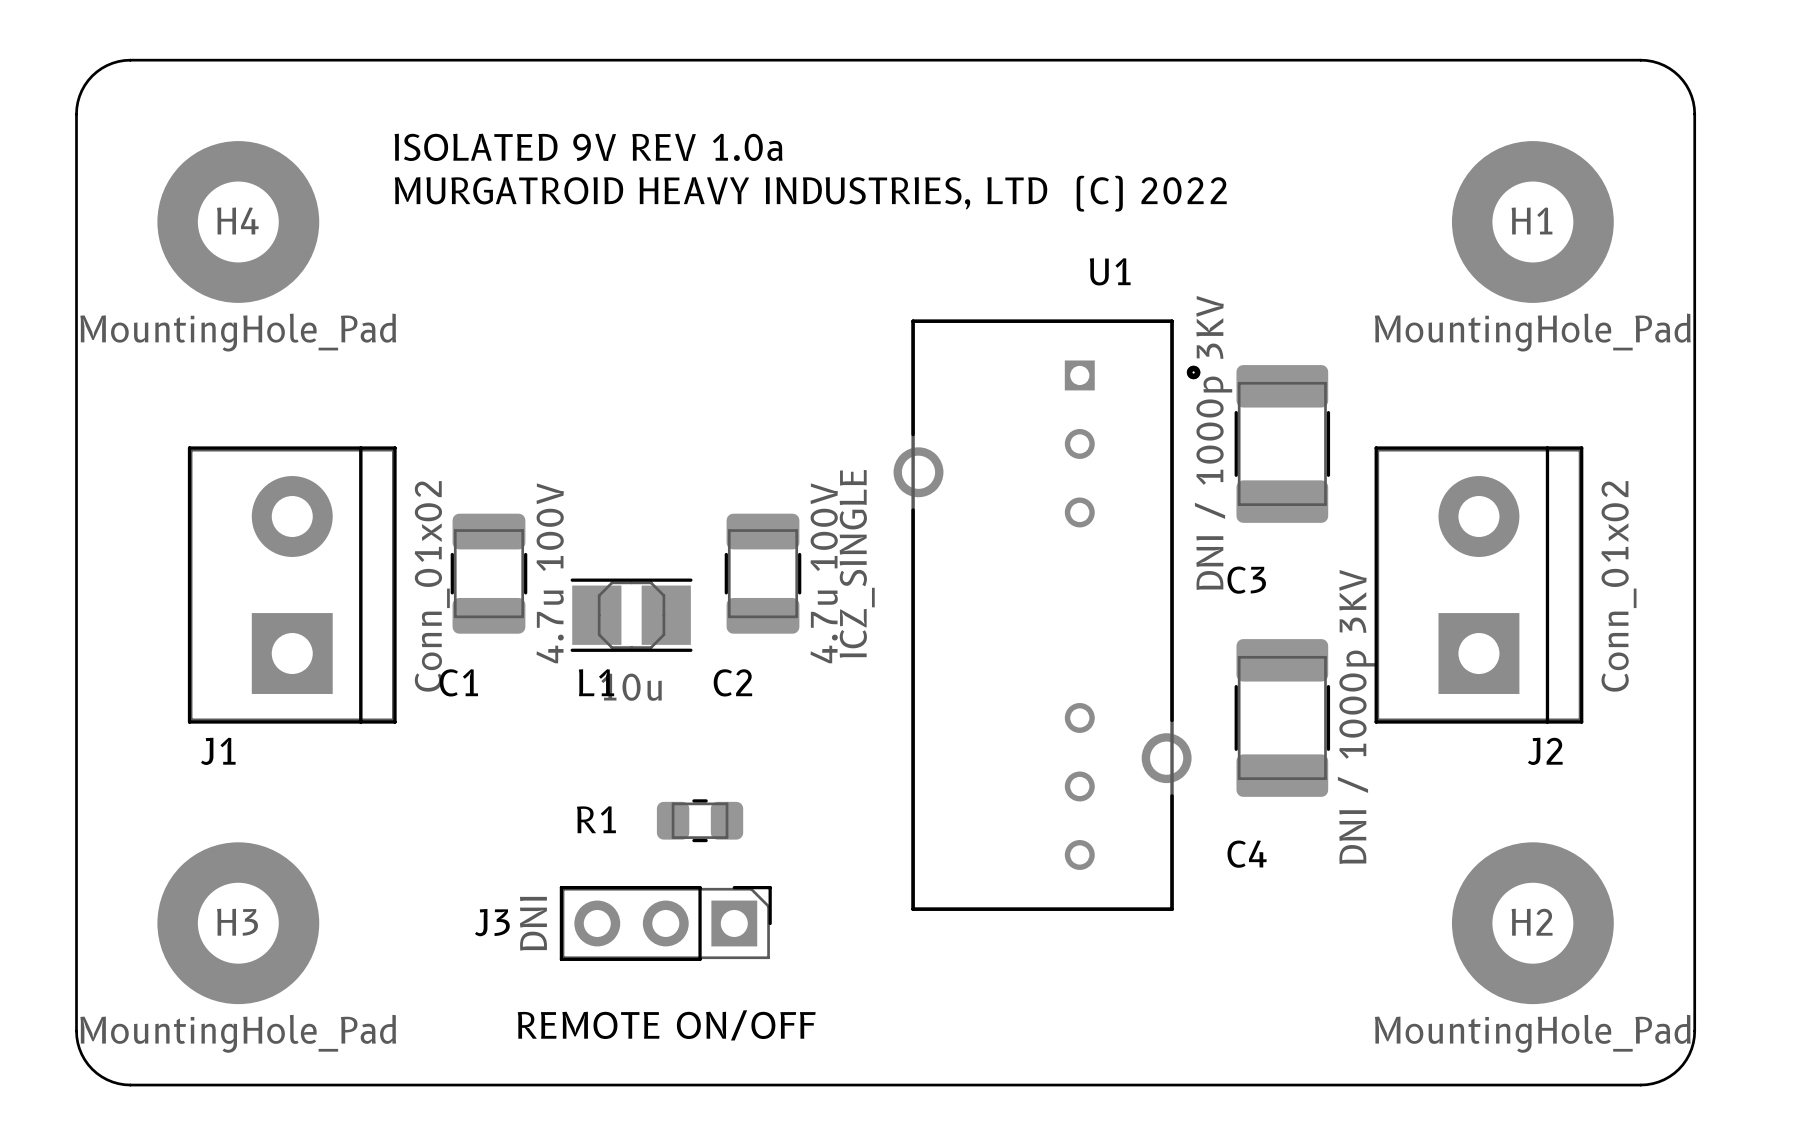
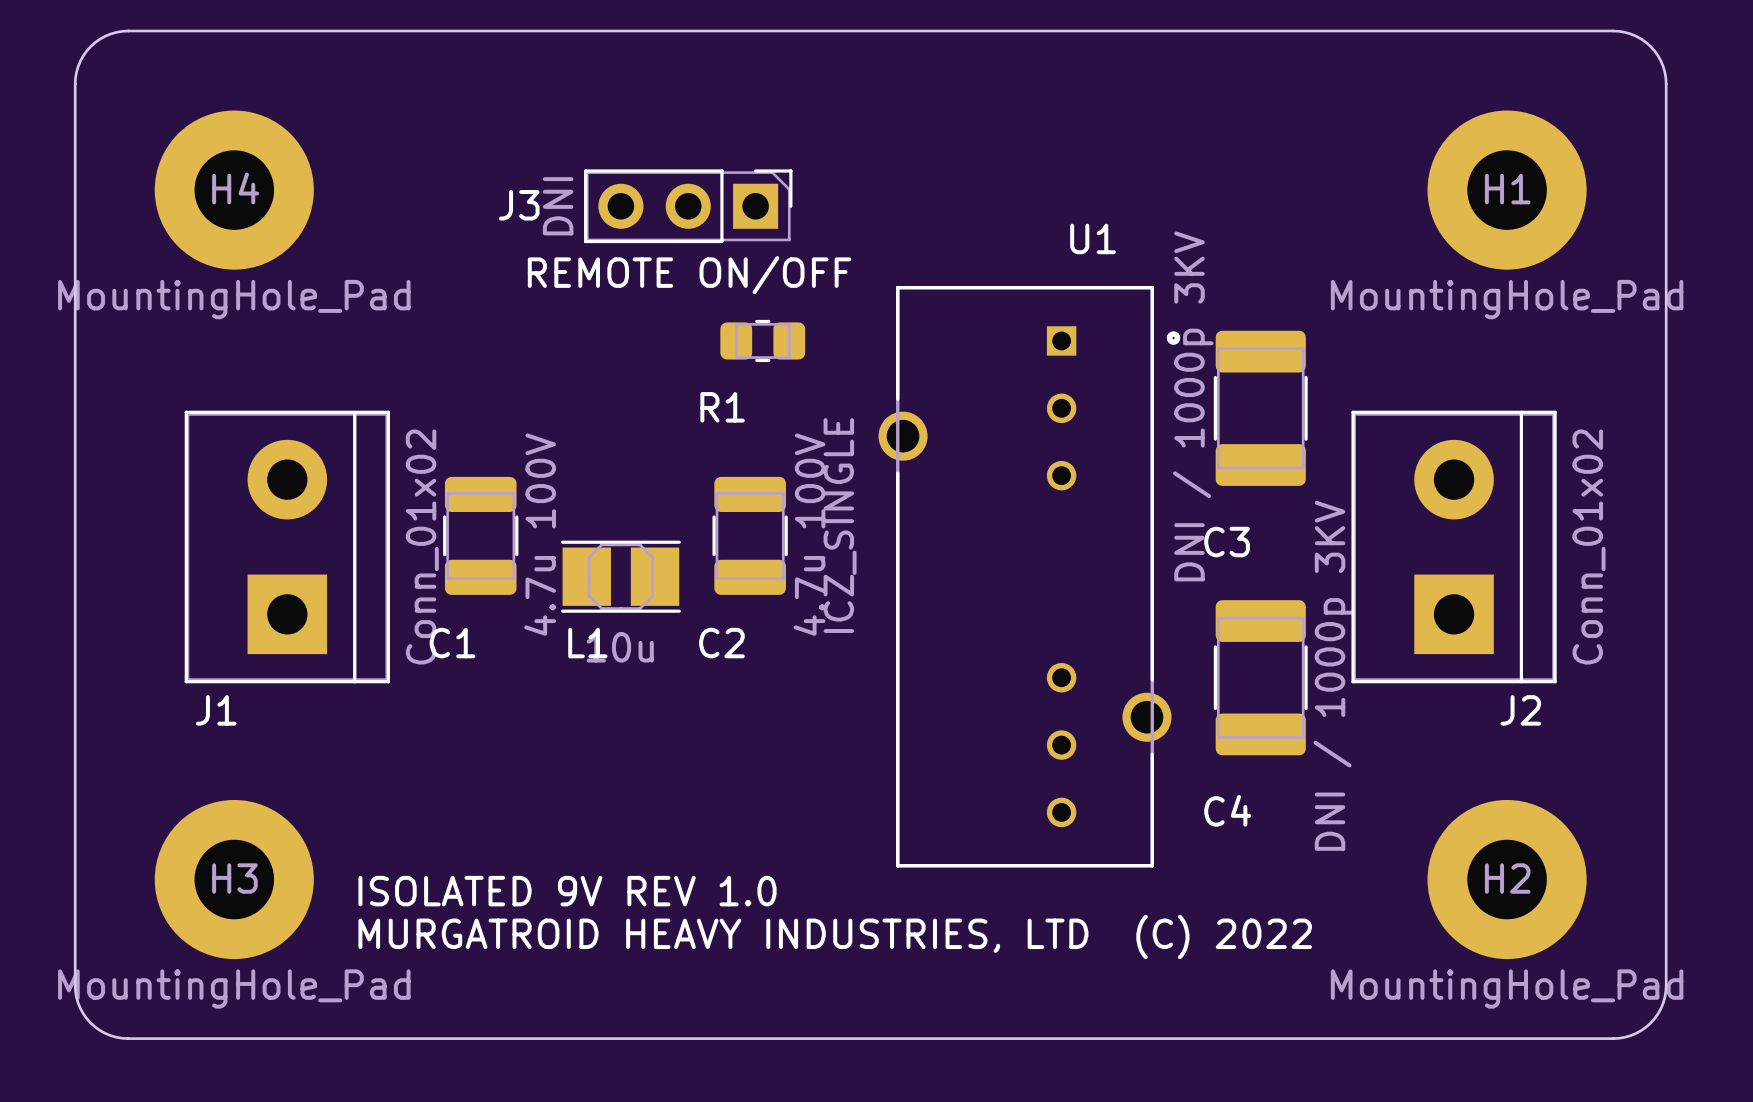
text: ISOLATED 9V REV 1.0a (588, 147) -> none
text: MURGATROID HEAVY INDUSTRIES, LTD (C) 2022 (810, 193) -> none
text: none -> REMOTE ON/OFF (689, 275)
R1 name position: R1 (596, 819) -> R1 (722, 407)
R1 position: (700, 820) -> (762, 340)
J3 position: (665, 923) -> (688, 206)
text: none -> ISOLATED 9V REV 1.0 (567, 891)
text: none -> MURGATROID HEAVY INDUSTRIES, LTD (C) 2022 (835, 936)
text: REMOTE ON/OFF (666, 1025) -> none

